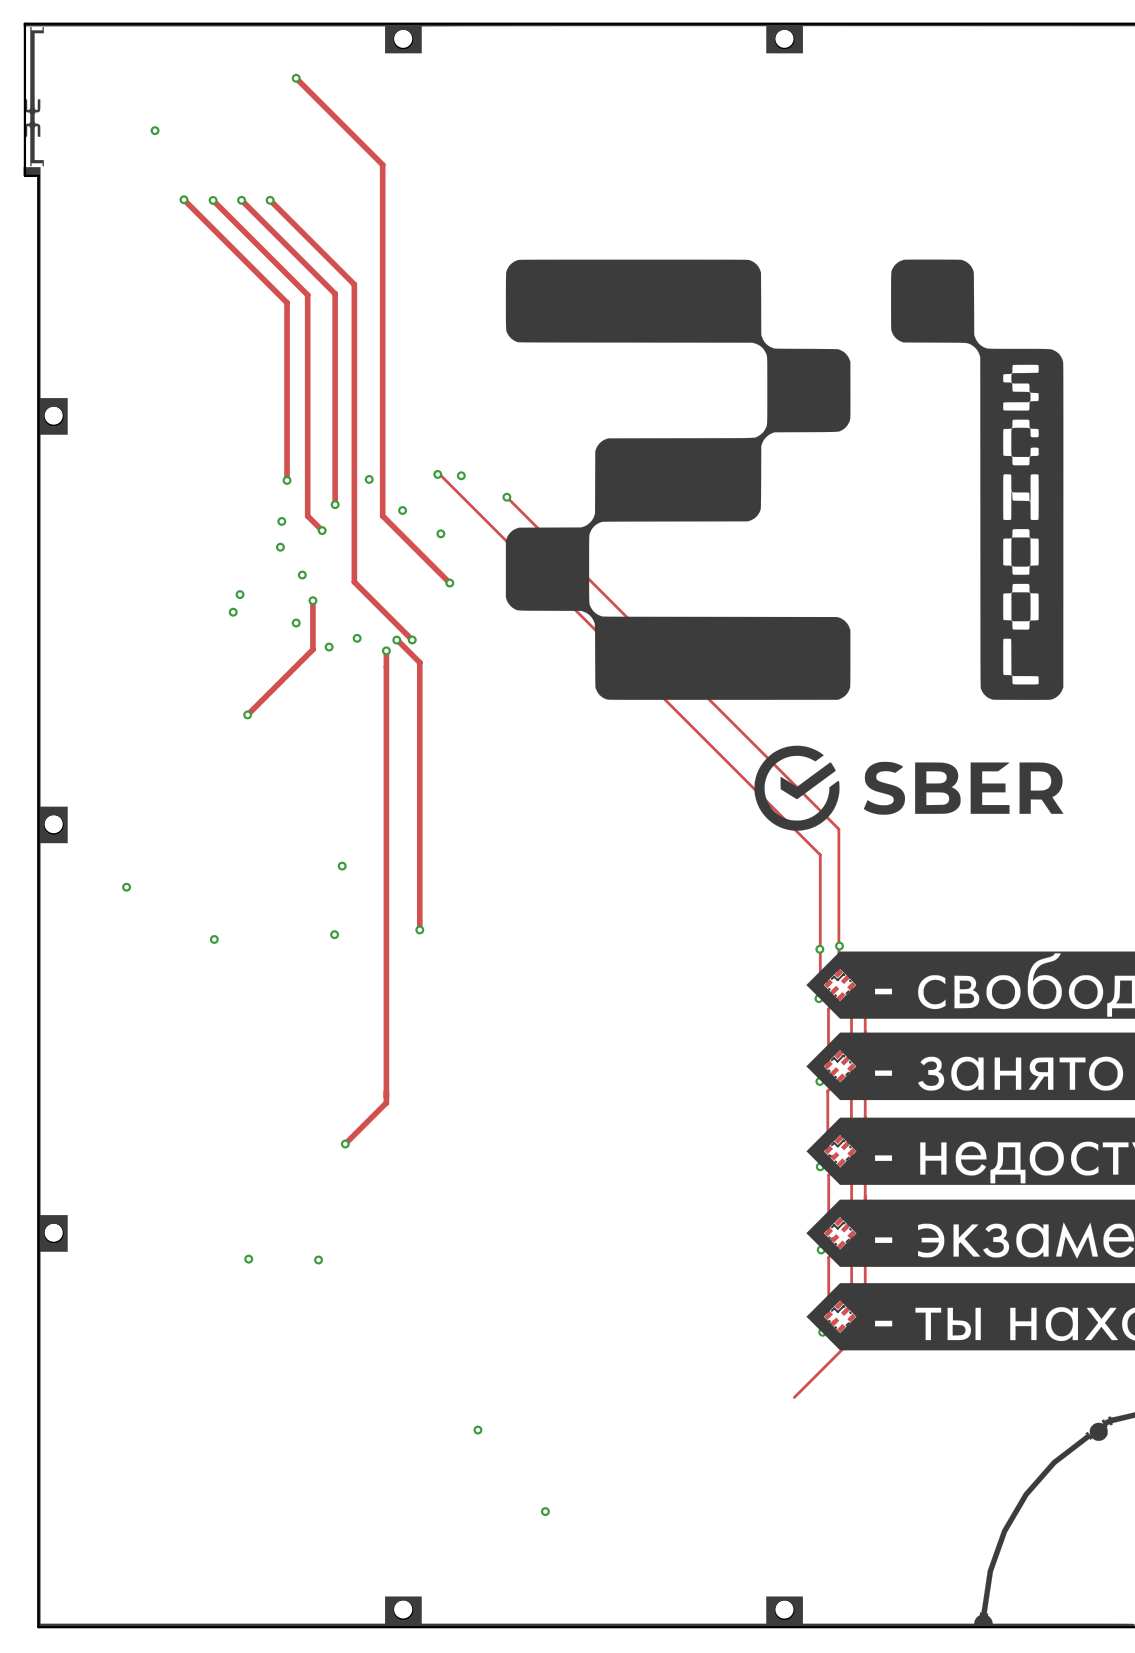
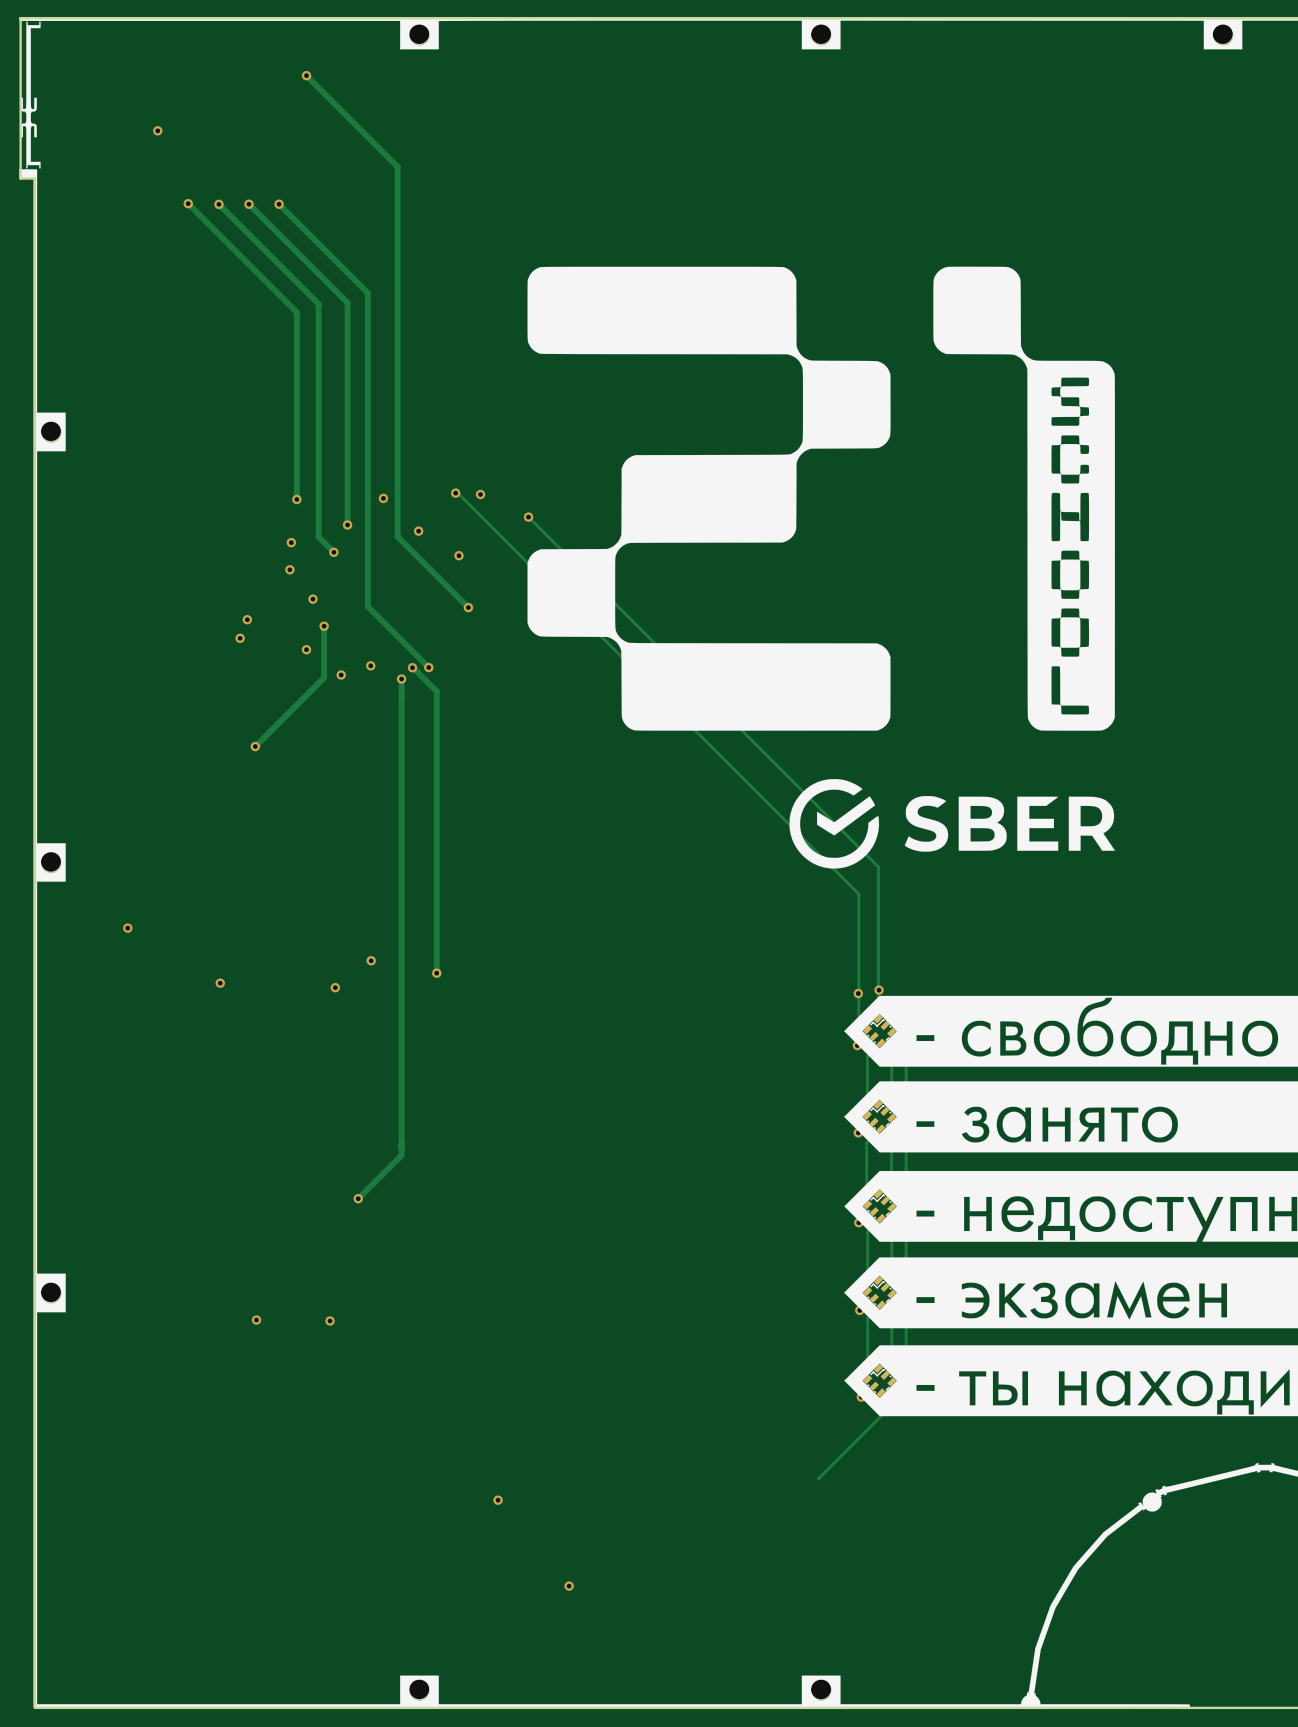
via: (342, 866) -> none
via: none -> (371, 960)
via: (334, 934) -> none
via: none -> (335, 987)
track: none -> (831, 1465) (818, 1478)

